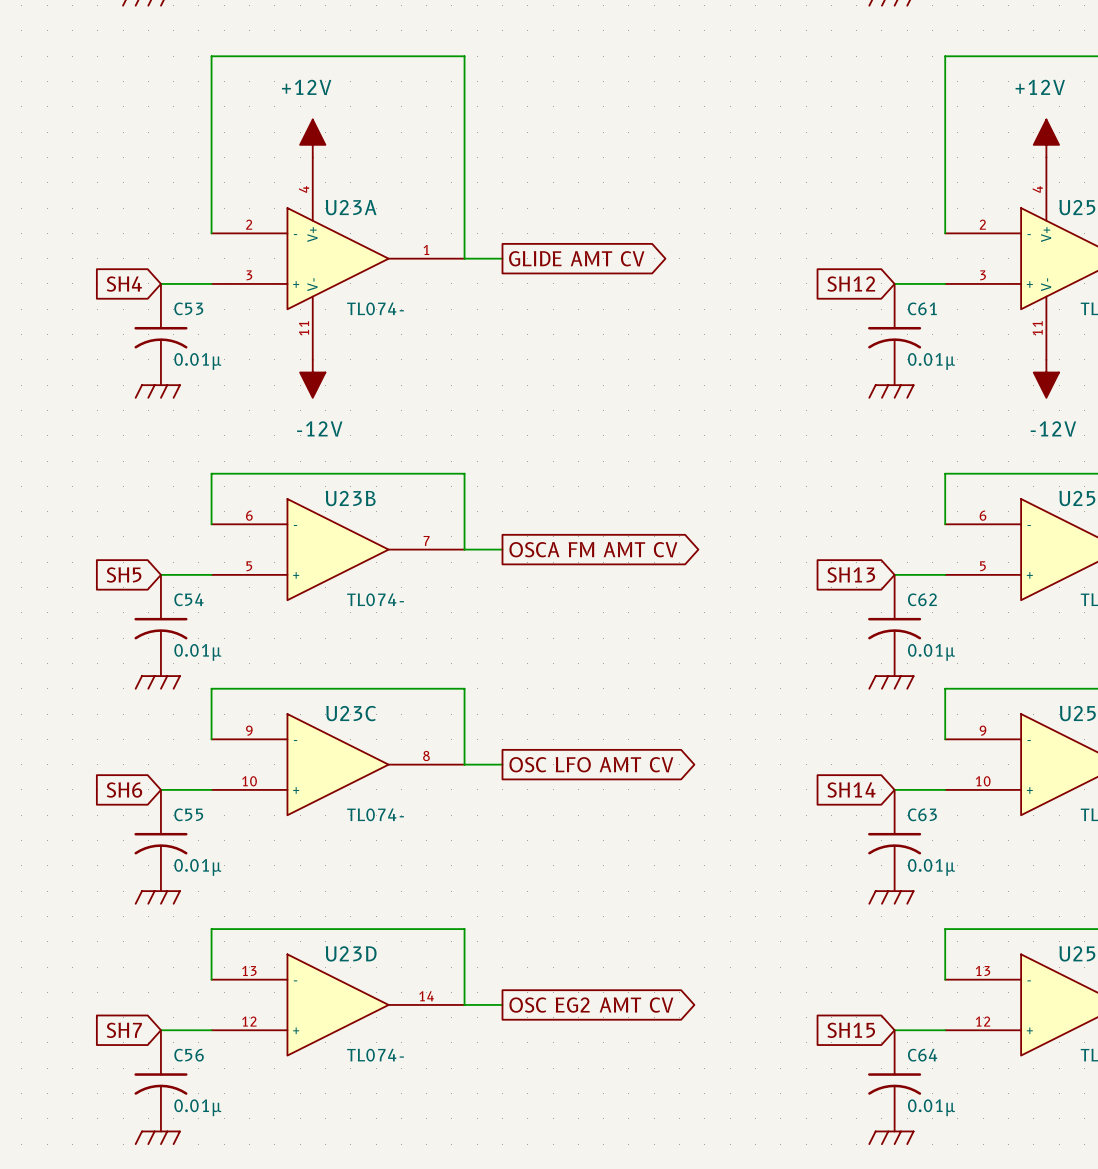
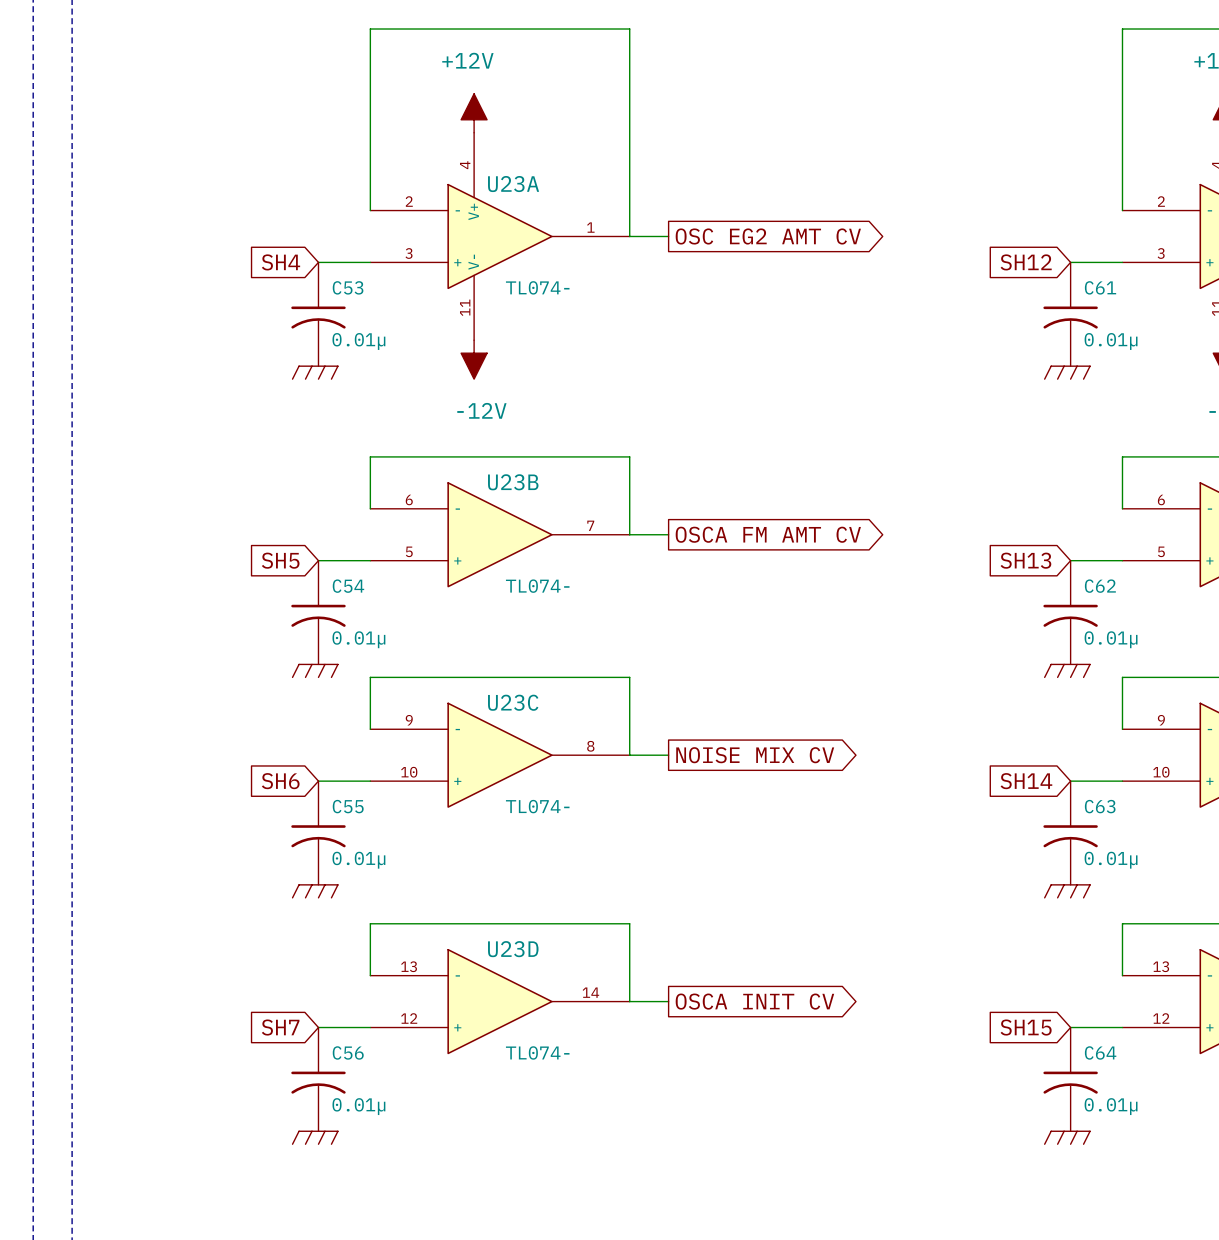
global label: GLIDE AMT CV (576, 258) -> OSC EG2 AMT CV (768, 236)
global label: OSC LFO AMT CV (591, 764) -> NOISE MIX CV (755, 755)
global label: OSC EG2 AMT CV (591, 1005) -> OSCA INIT CV (754, 1001)

